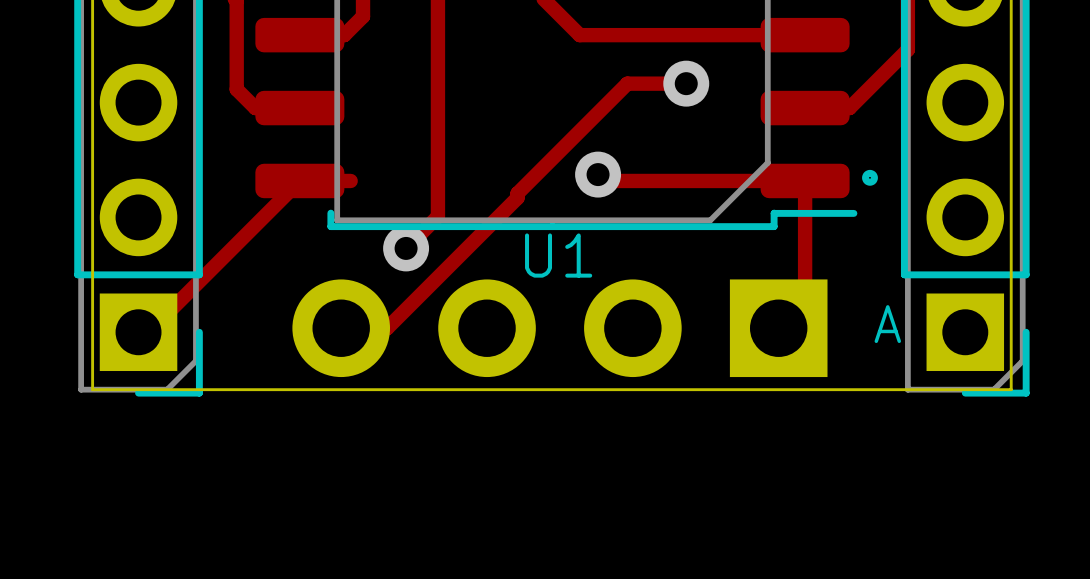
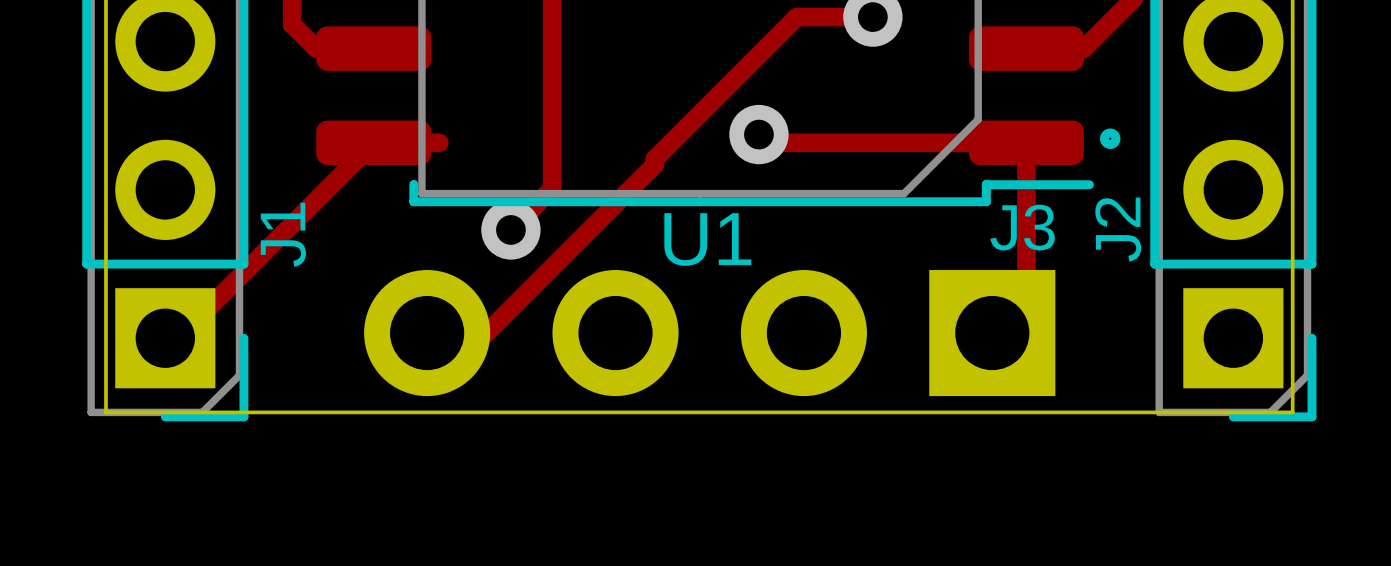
J3 name: none -> J3 (1022, 227)
text: none -> J2 (1118, 229)
text: none -> J1 (283, 234)
text: A (887, 324) -> none

